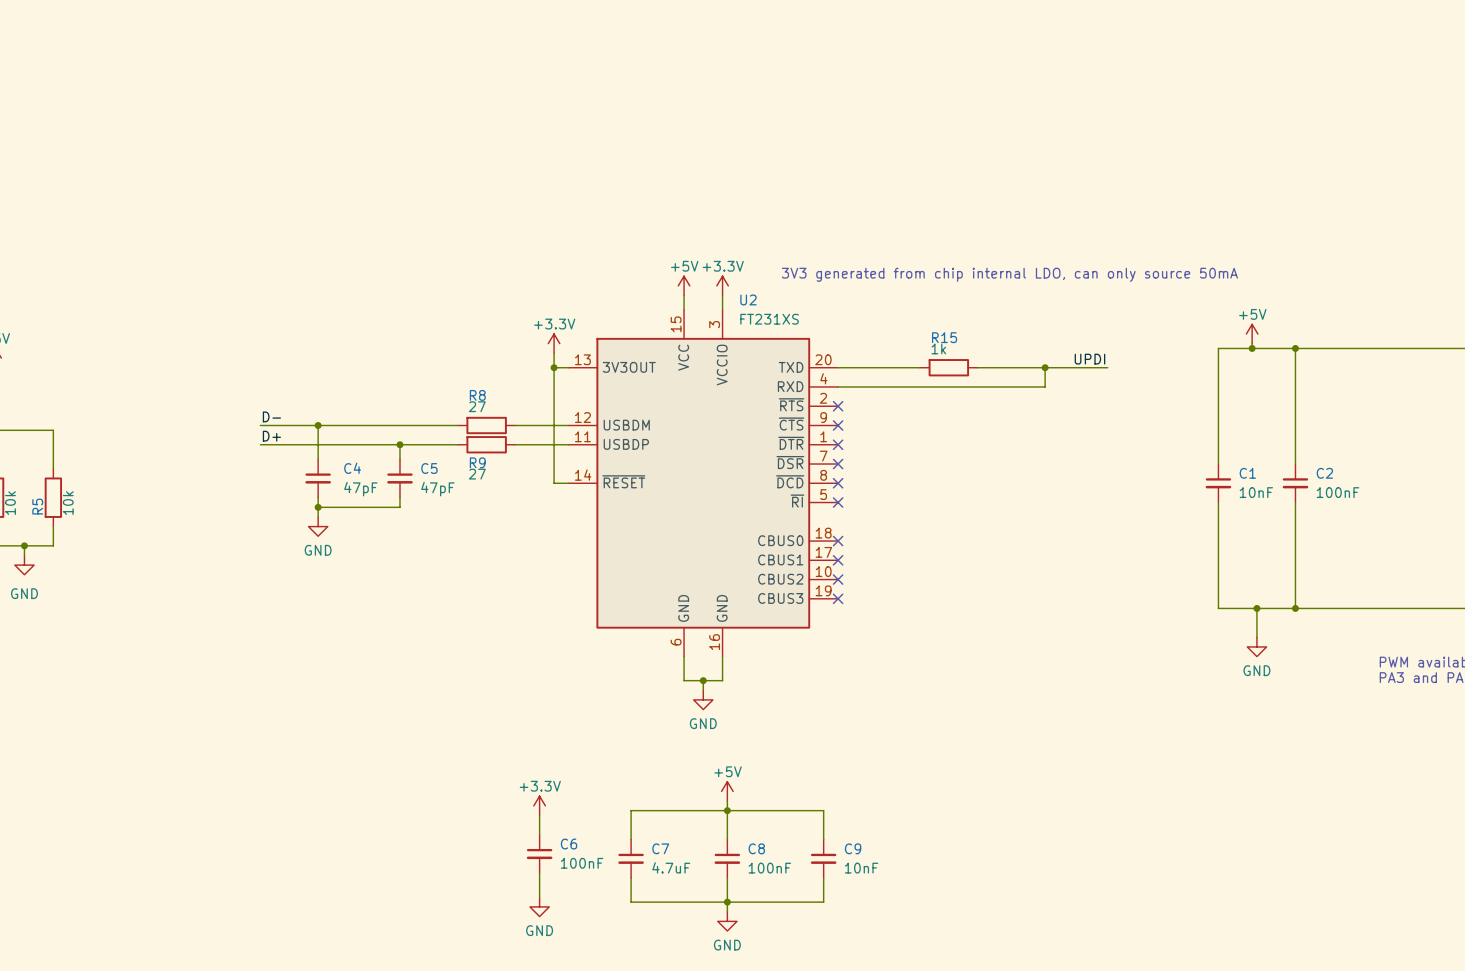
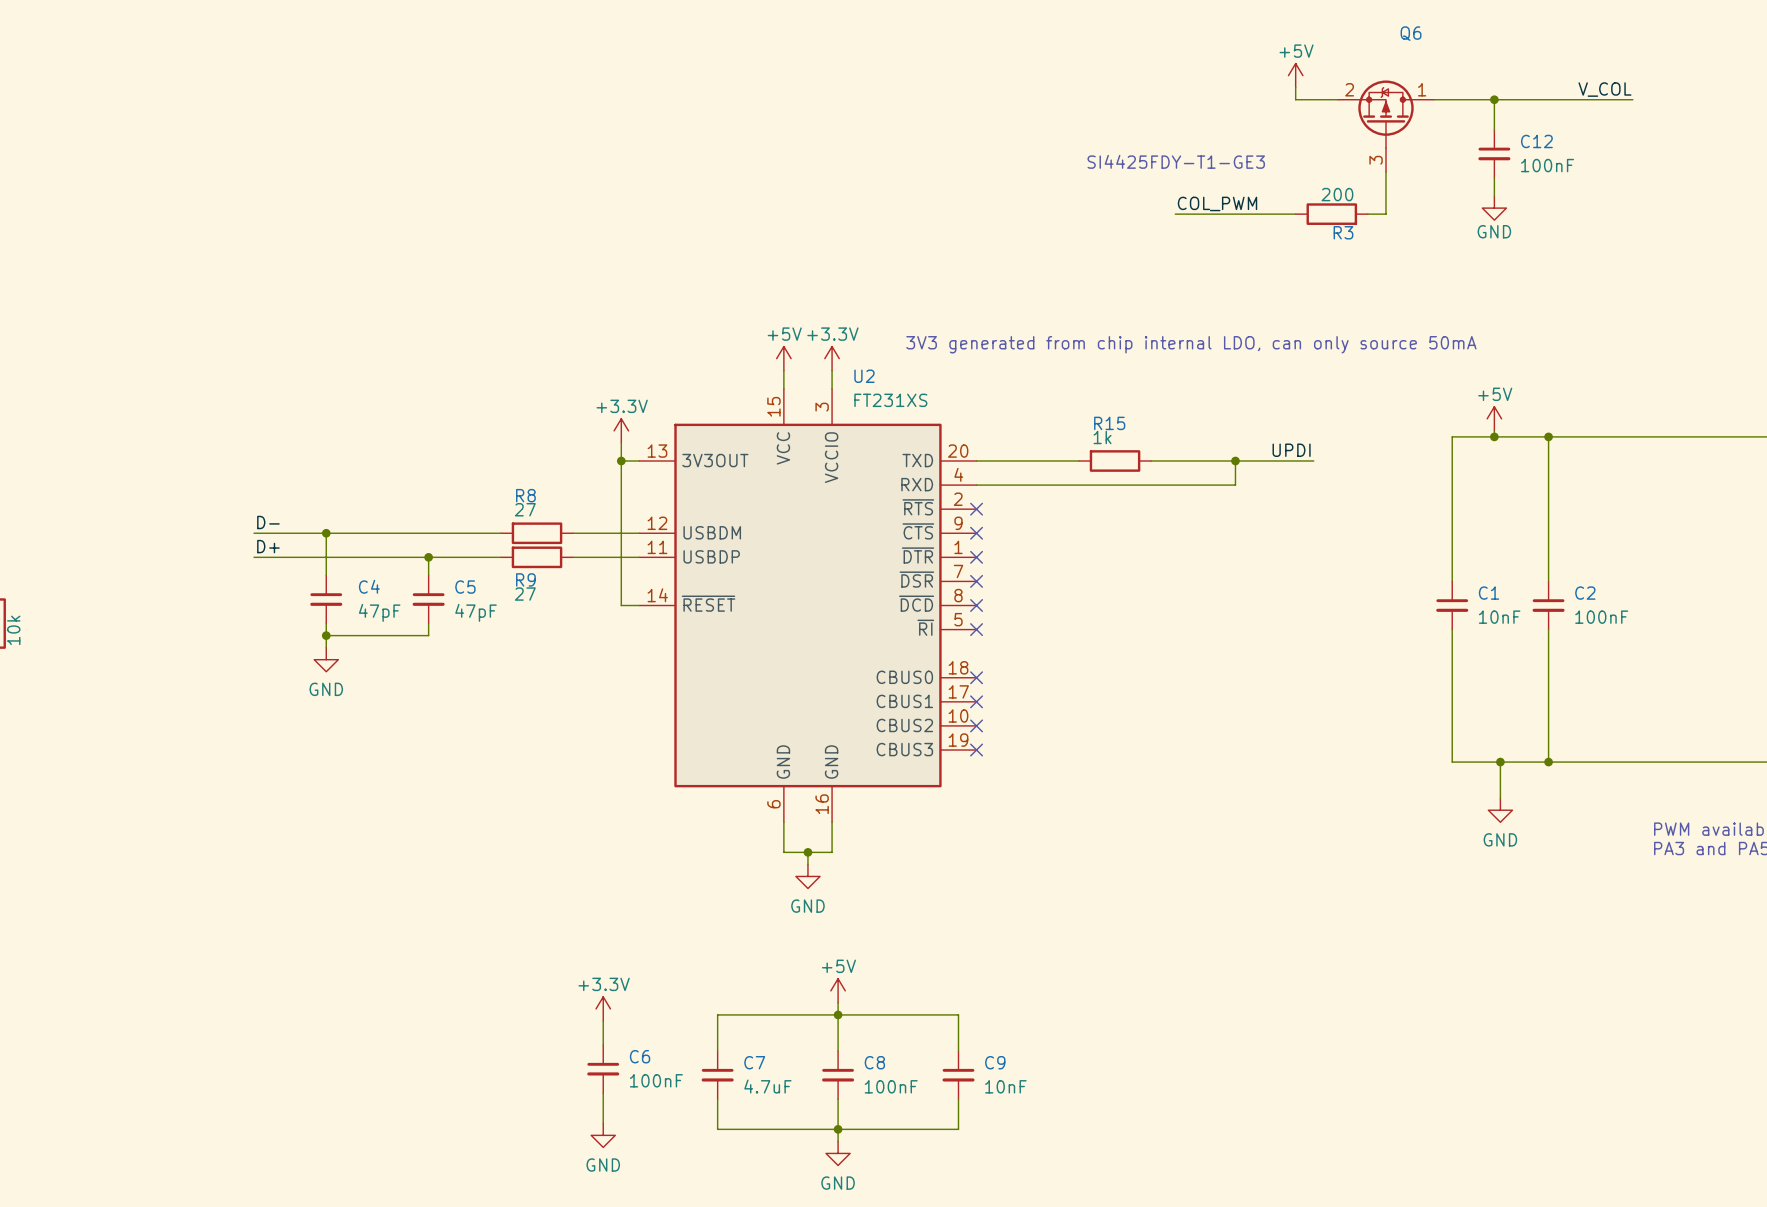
power symbol: none -> +5V (1295, 75)
wire: none -> (1295, 87) (1295, 99) (1337, 99)
label: none -> V_COL (1604, 89)
wire: none -> (1434, 99) (1632, 99)
wire: none -> (1494, 99) (1494, 129)
junction: none -> (1494, 99)
Q6: none -> (1386, 126)
C12: none -> 100nF (1494, 153)
text: none -> SI4425FDY-T1-GE3 (1176, 161)
wire: none -> (1386, 171) (1386, 214) (1367, 214)
wire: none -> (1494, 178) (1494, 196)
label: none -> COL_PWM (1217, 203)
power symbol: none -> GND (1494, 208)
wire: none -> (1175, 214) (1295, 214)
R3: none -> 200 (1331, 214)

